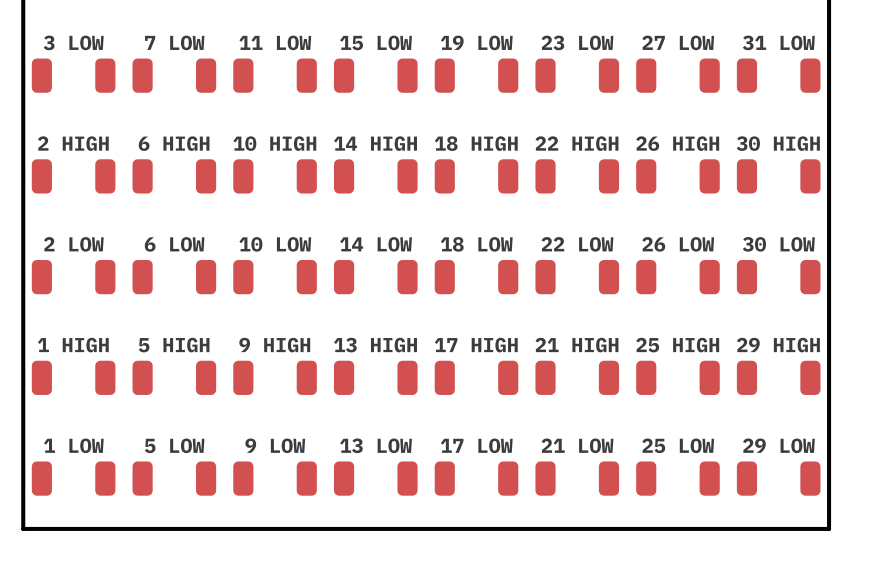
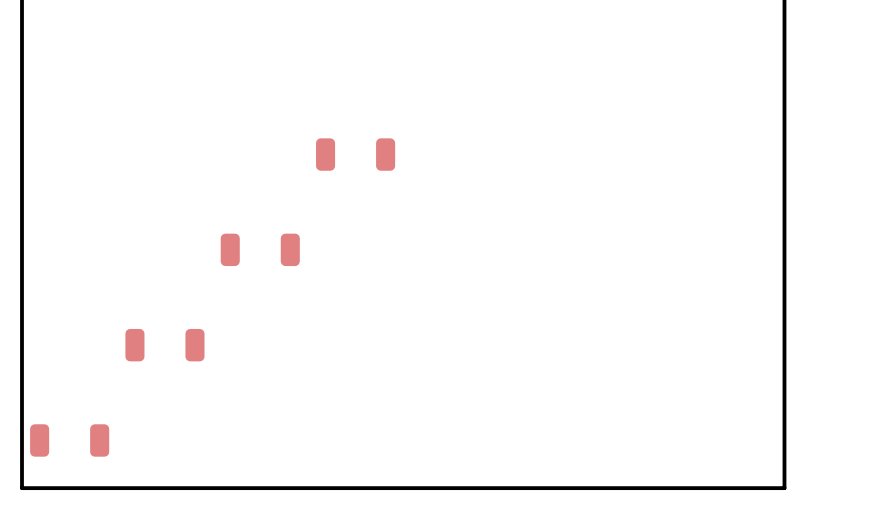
part: (73, 75) -> none
part: (174, 75) -> none
part: (275, 75) -> none
part: (375, 75) -> none
part: (476, 75) -> none
part: (577, 75) -> none
part: (677, 75) -> none
part: (778, 75) -> none
part text: 14 HIGH (375, 143) -> none
part: (73, 176) -> none
part: (174, 176) -> none
part: (275, 176) -> none
part: (476, 176) -> none
part: (577, 176) -> none
part: (677, 176) -> none
part: (778, 176) -> none
part text: 10 LOW (275, 244) -> none
part: (73, 277) -> none
part: (174, 277) -> none
part: (375, 277) -> none
part: (476, 277) -> none
part: (577, 277) -> none
part: (677, 277) -> none
part: (778, 277) -> none
part text: 5 HIGH (174, 345) -> none
part: (73, 377) -> none
part: (275, 377) -> none
part: (375, 377) -> none
part: (476, 377) -> none
part: (577, 377) -> none
part: (677, 377) -> none
part: (778, 377) -> none
part text: 1 LOW (73, 445) -> none
part: (174, 478) -> none
part: (275, 478) -> none
part: (375, 478) -> none
part: (476, 478) -> none
part: (577, 478) -> none
part: (677, 478) -> none
part: (778, 478) -> none

